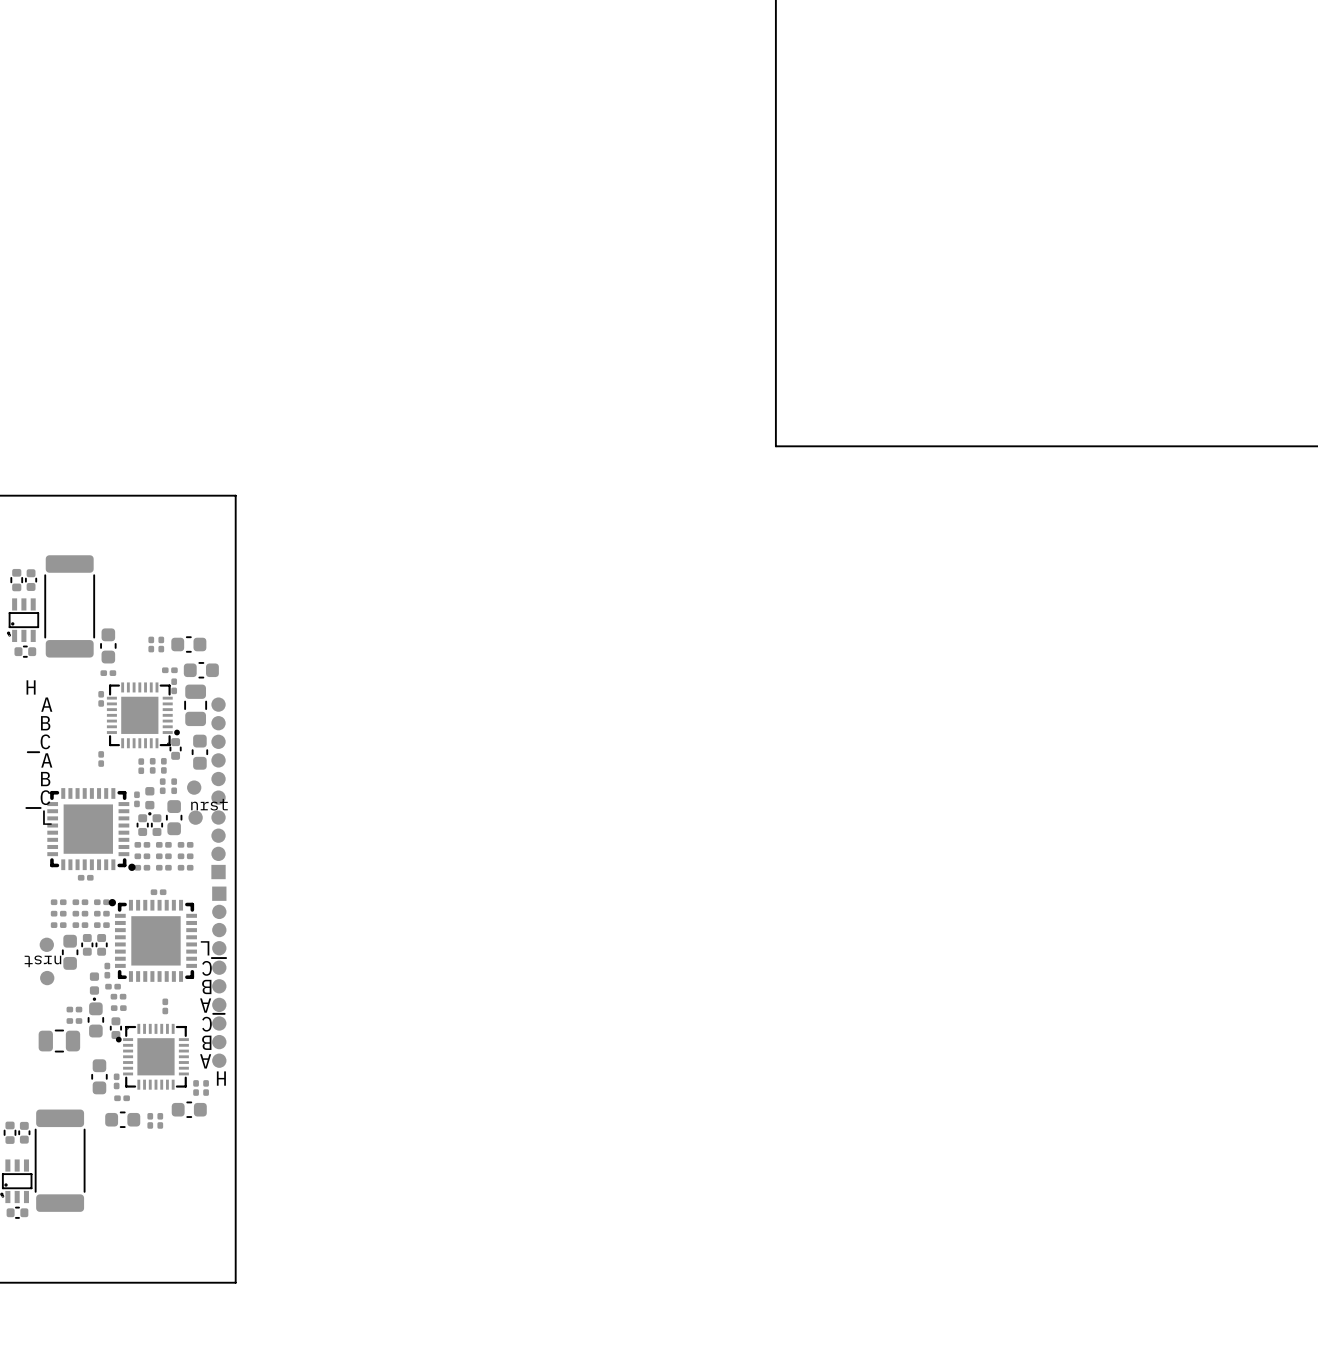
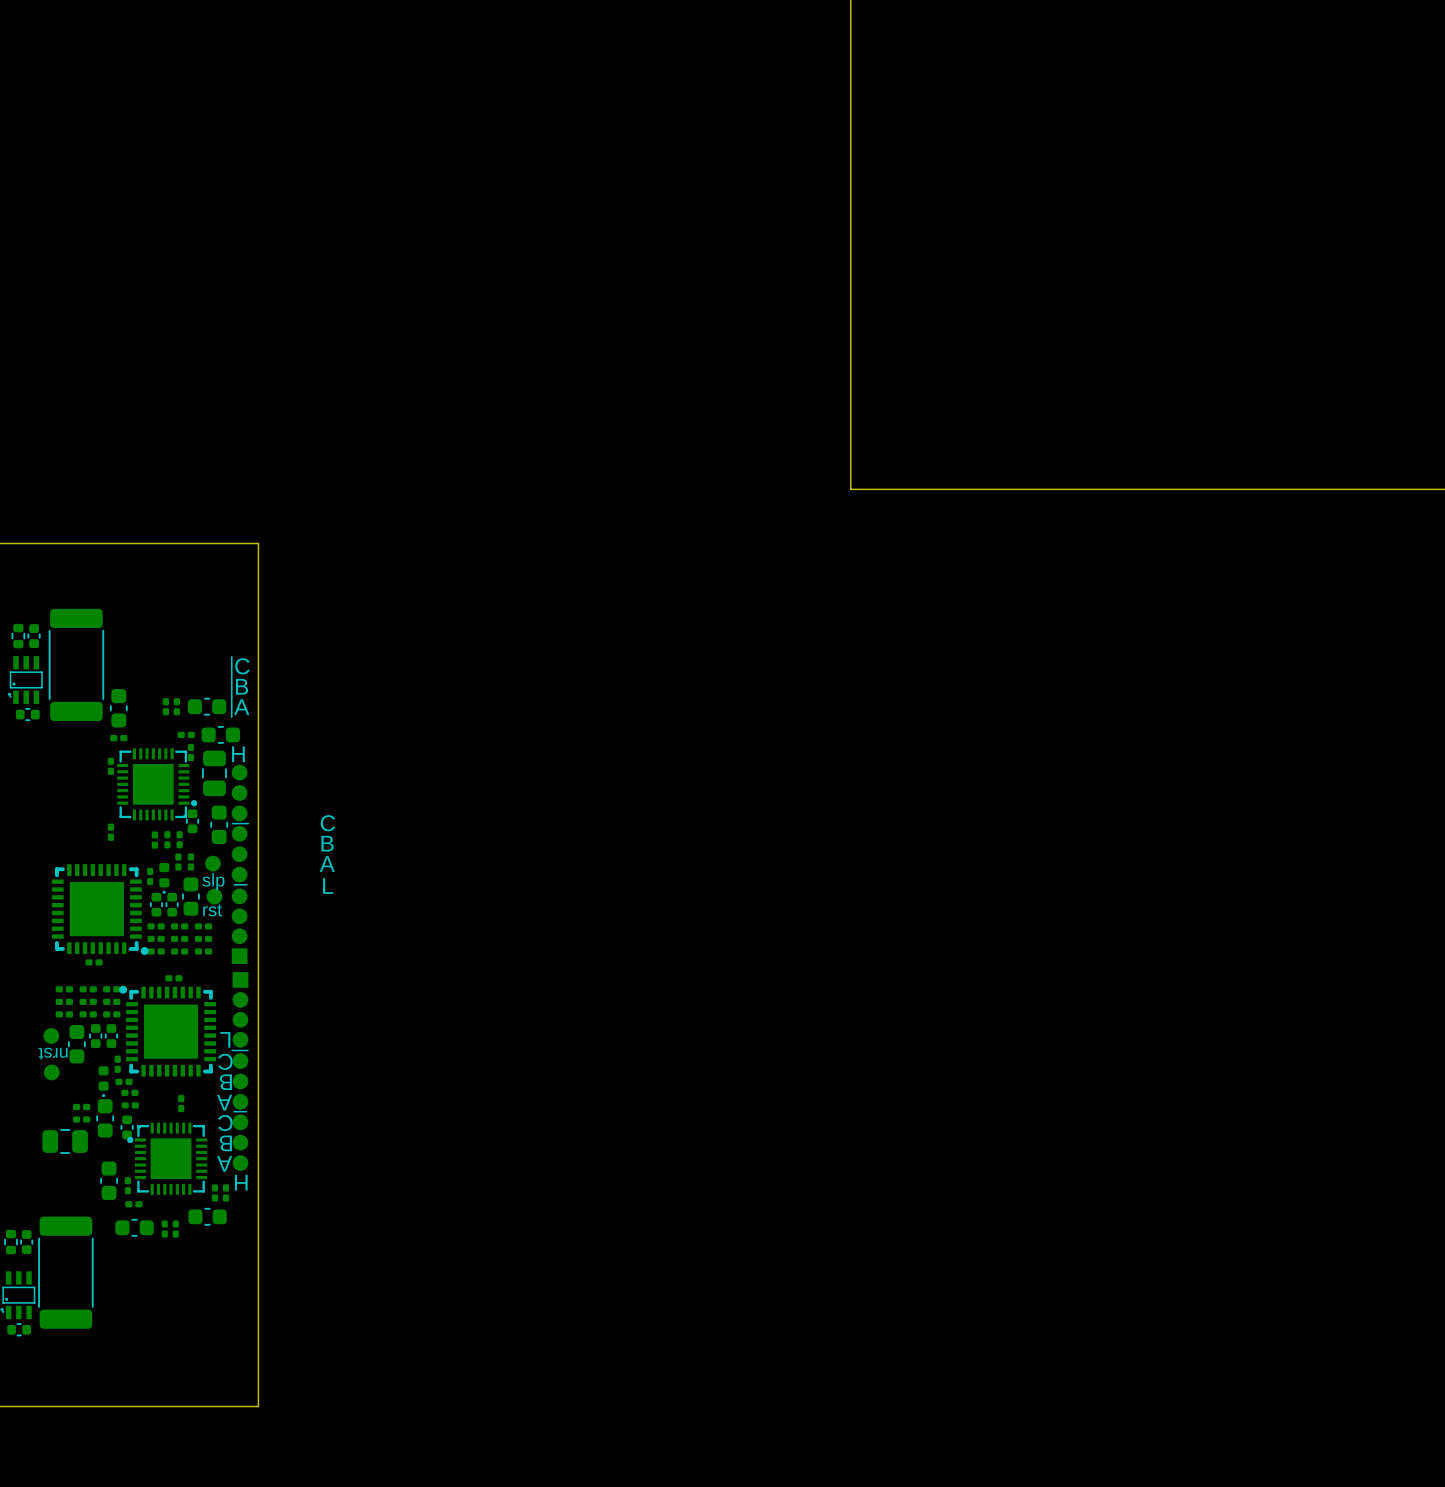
line: none -> (231, 656) (231, 717)
text: none -> C (242, 666)
text: none -> B (242, 686)
text: none -> A (241, 707)
text position: H (31, 687) -> H (238, 754)
text: A (46, 704) -> none
text: B (45, 723) -> none
text: C (45, 741) -> none
text: none -> C (328, 823)
line: (39, 752) (27, 752) -> (246, 884) (234, 884)
text: A (46, 760) -> none
text: none -> B (327, 843)
text: B (45, 779) -> none
text: none -> A (327, 864)
text: C (45, 797) -> none
text: nrst (209, 804) -> slp (213, 881)
line: (40, 807) (26, 807) -> (248, 823) (232, 823)
text position: L (47, 817) -> L (328, 886)
text: none -> rst (212, 910)

